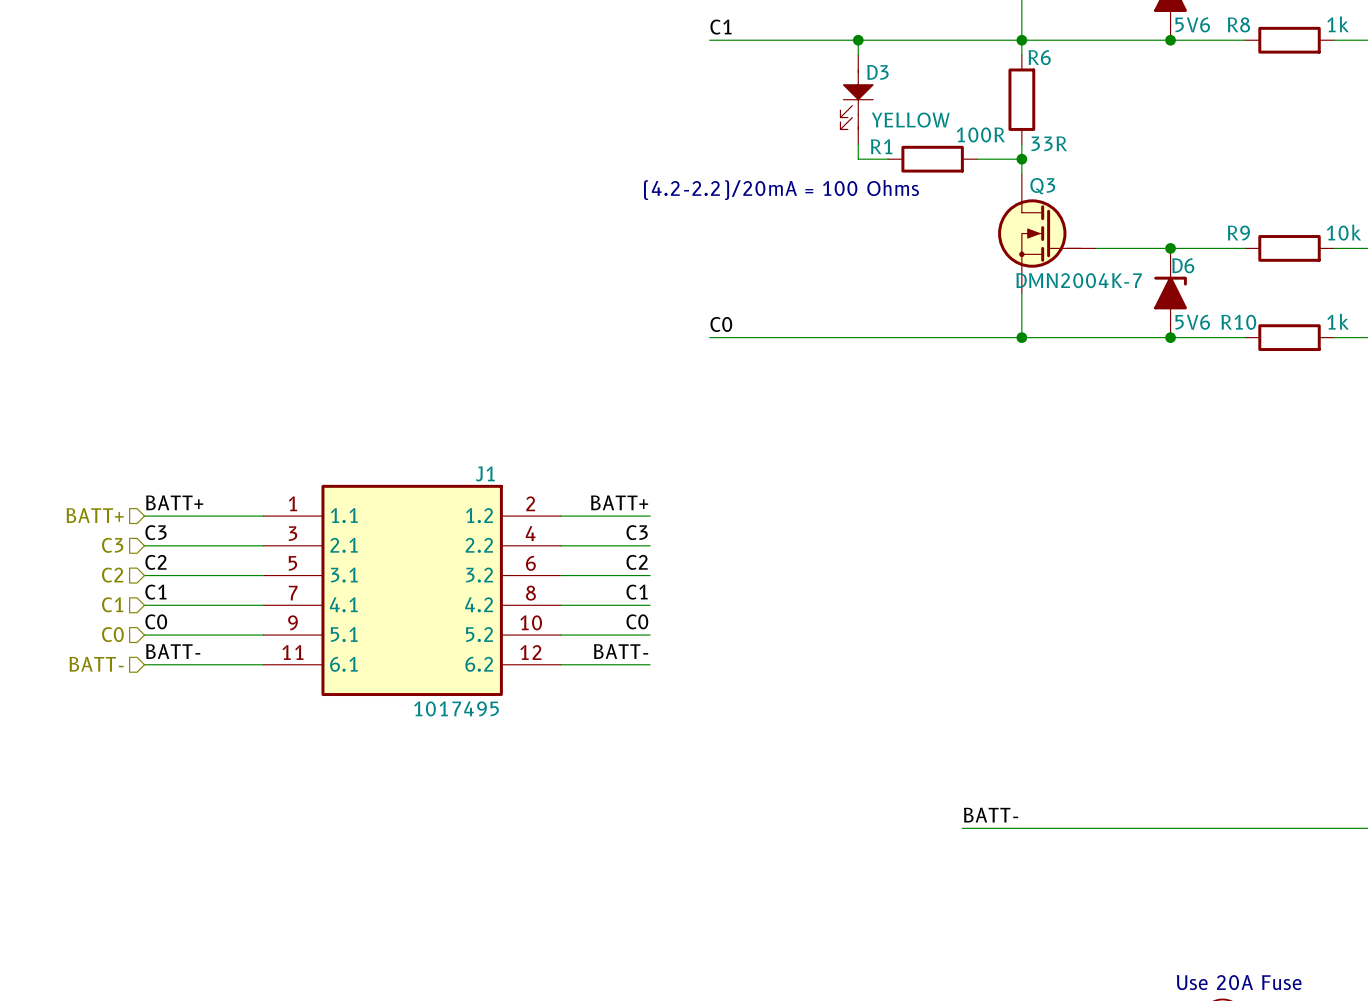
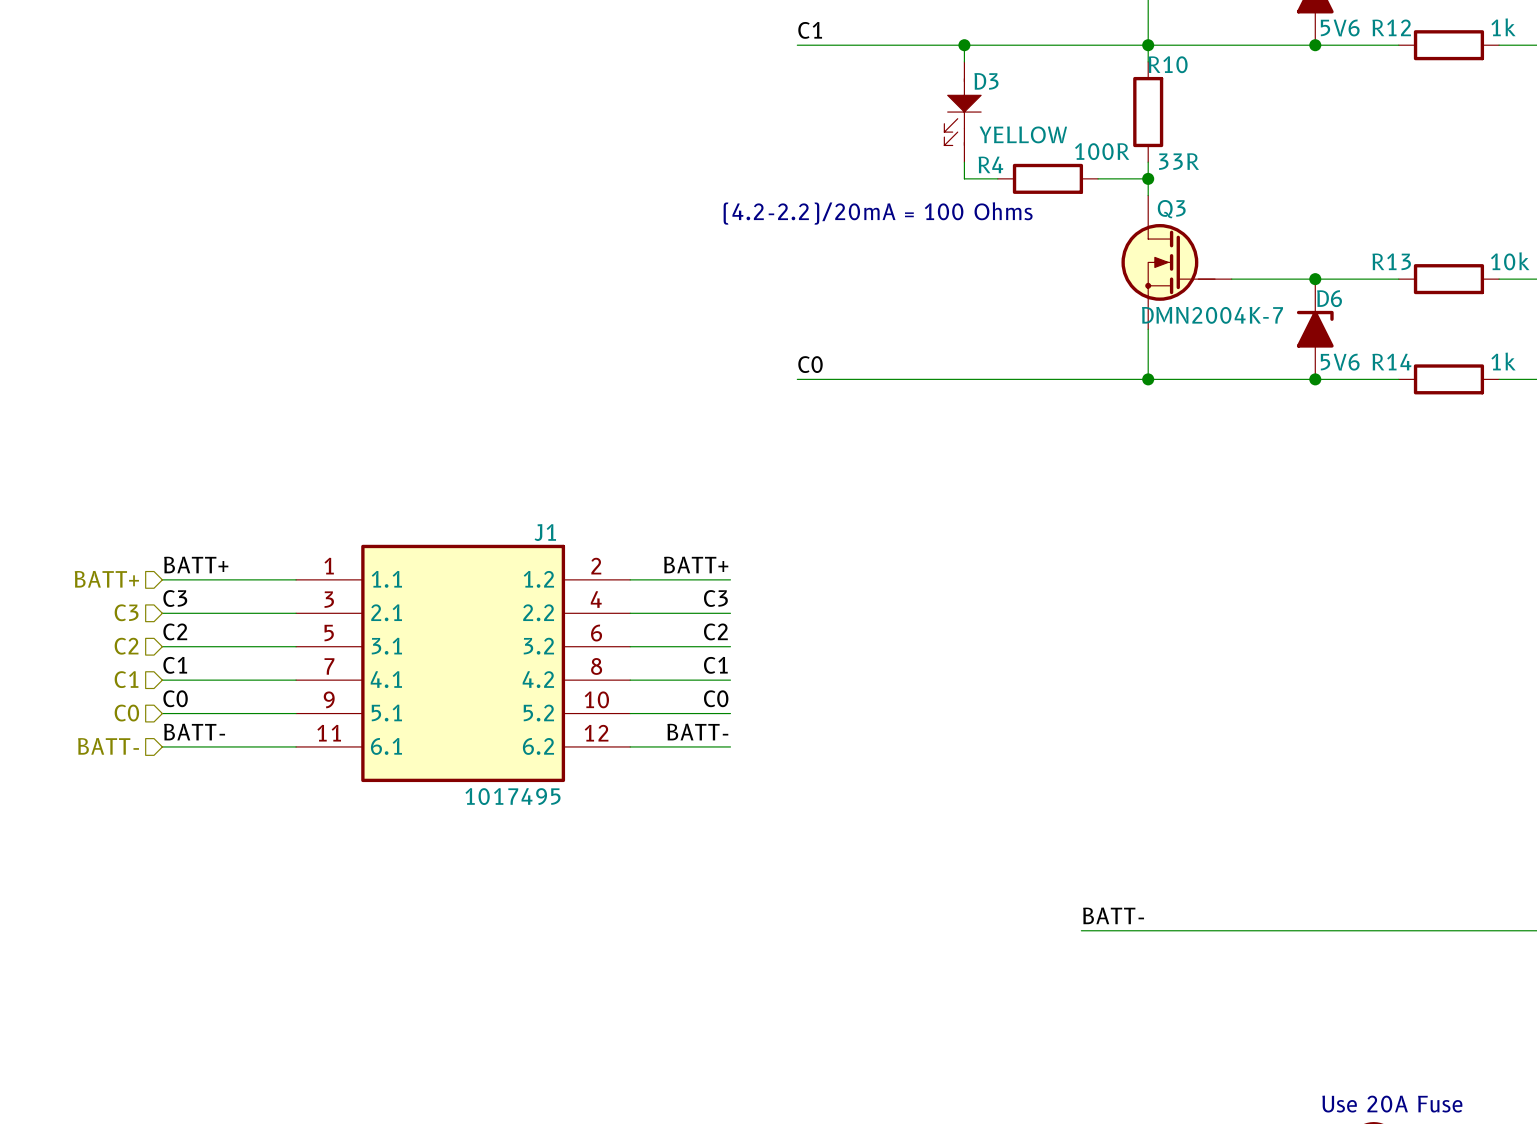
R8 name: R8 (1238, 24) -> R12 (1391, 27)
R6 name: R6 (1039, 57) -> R10 (1168, 64)
R1 name: R1 (881, 146) -> R4 (990, 164)
R9 name: R9 (1238, 233) -> R13 (1391, 261)
R10 name: R10 (1238, 322) -> R14 (1391, 362)

